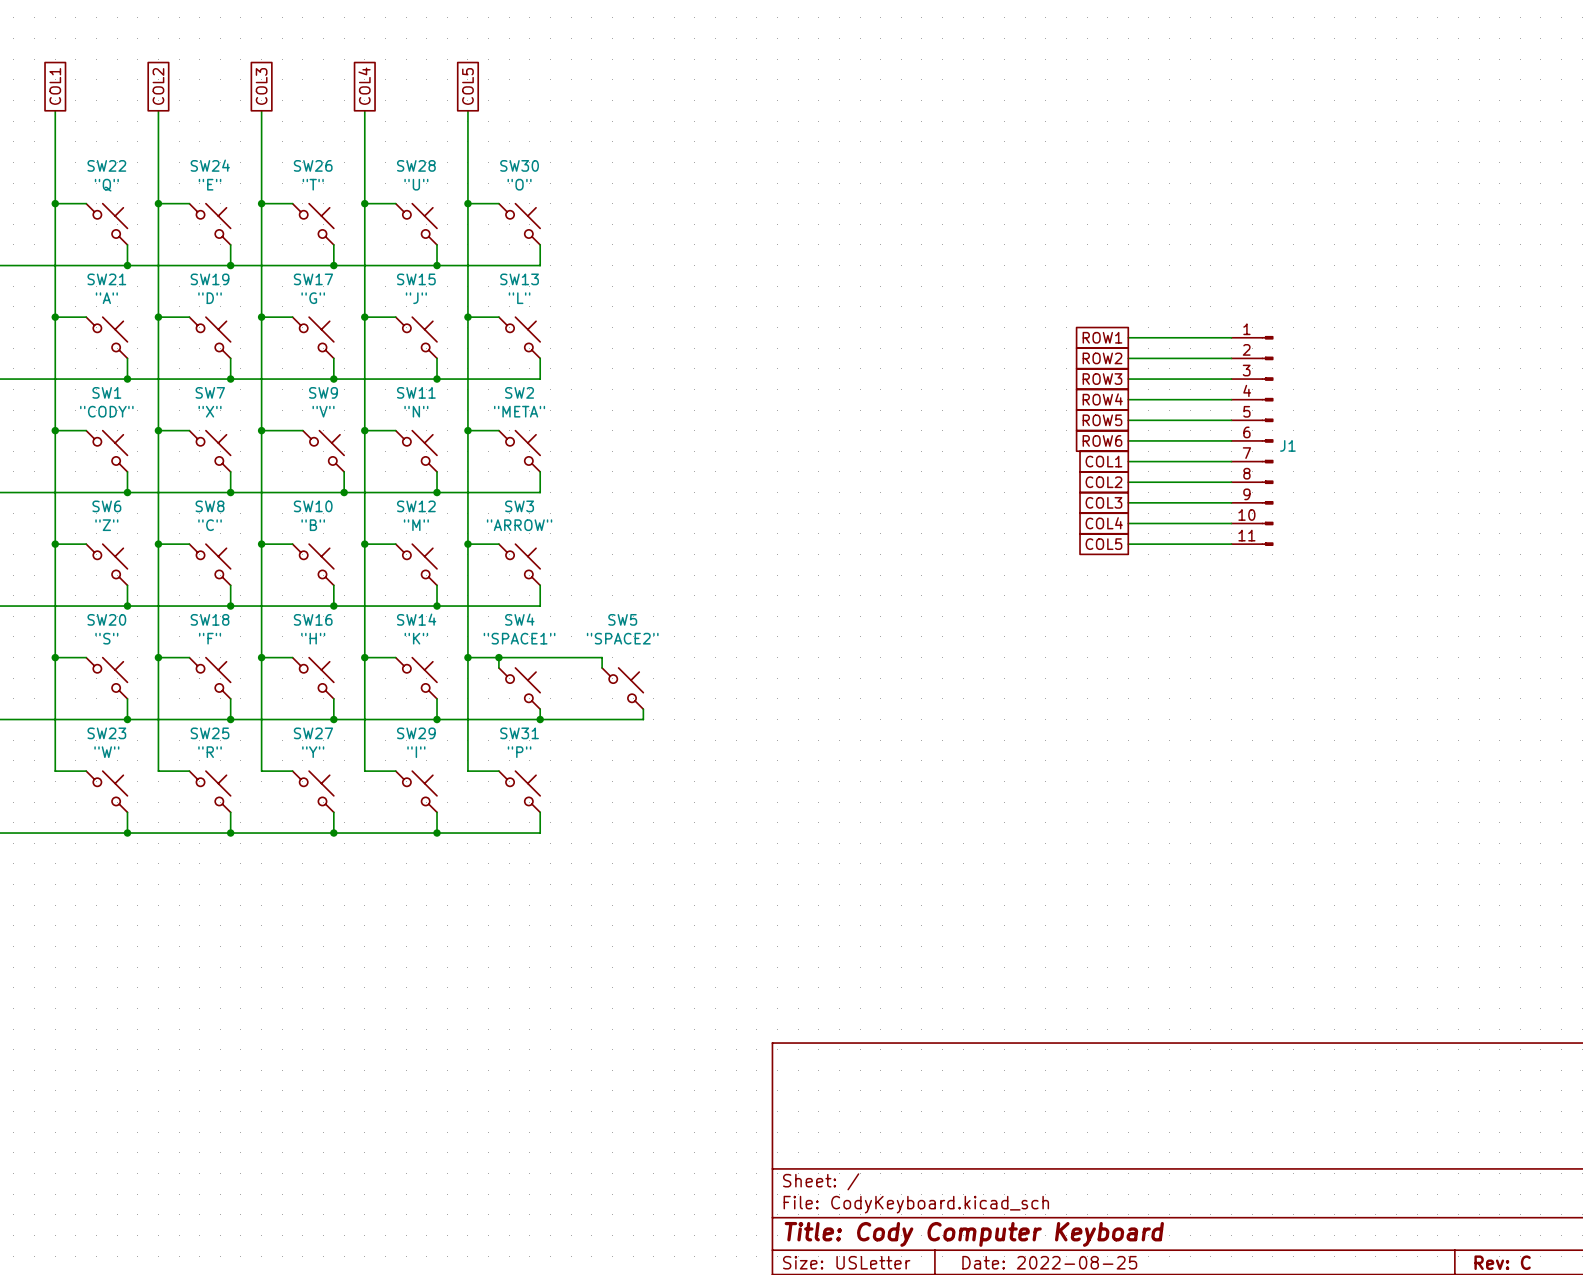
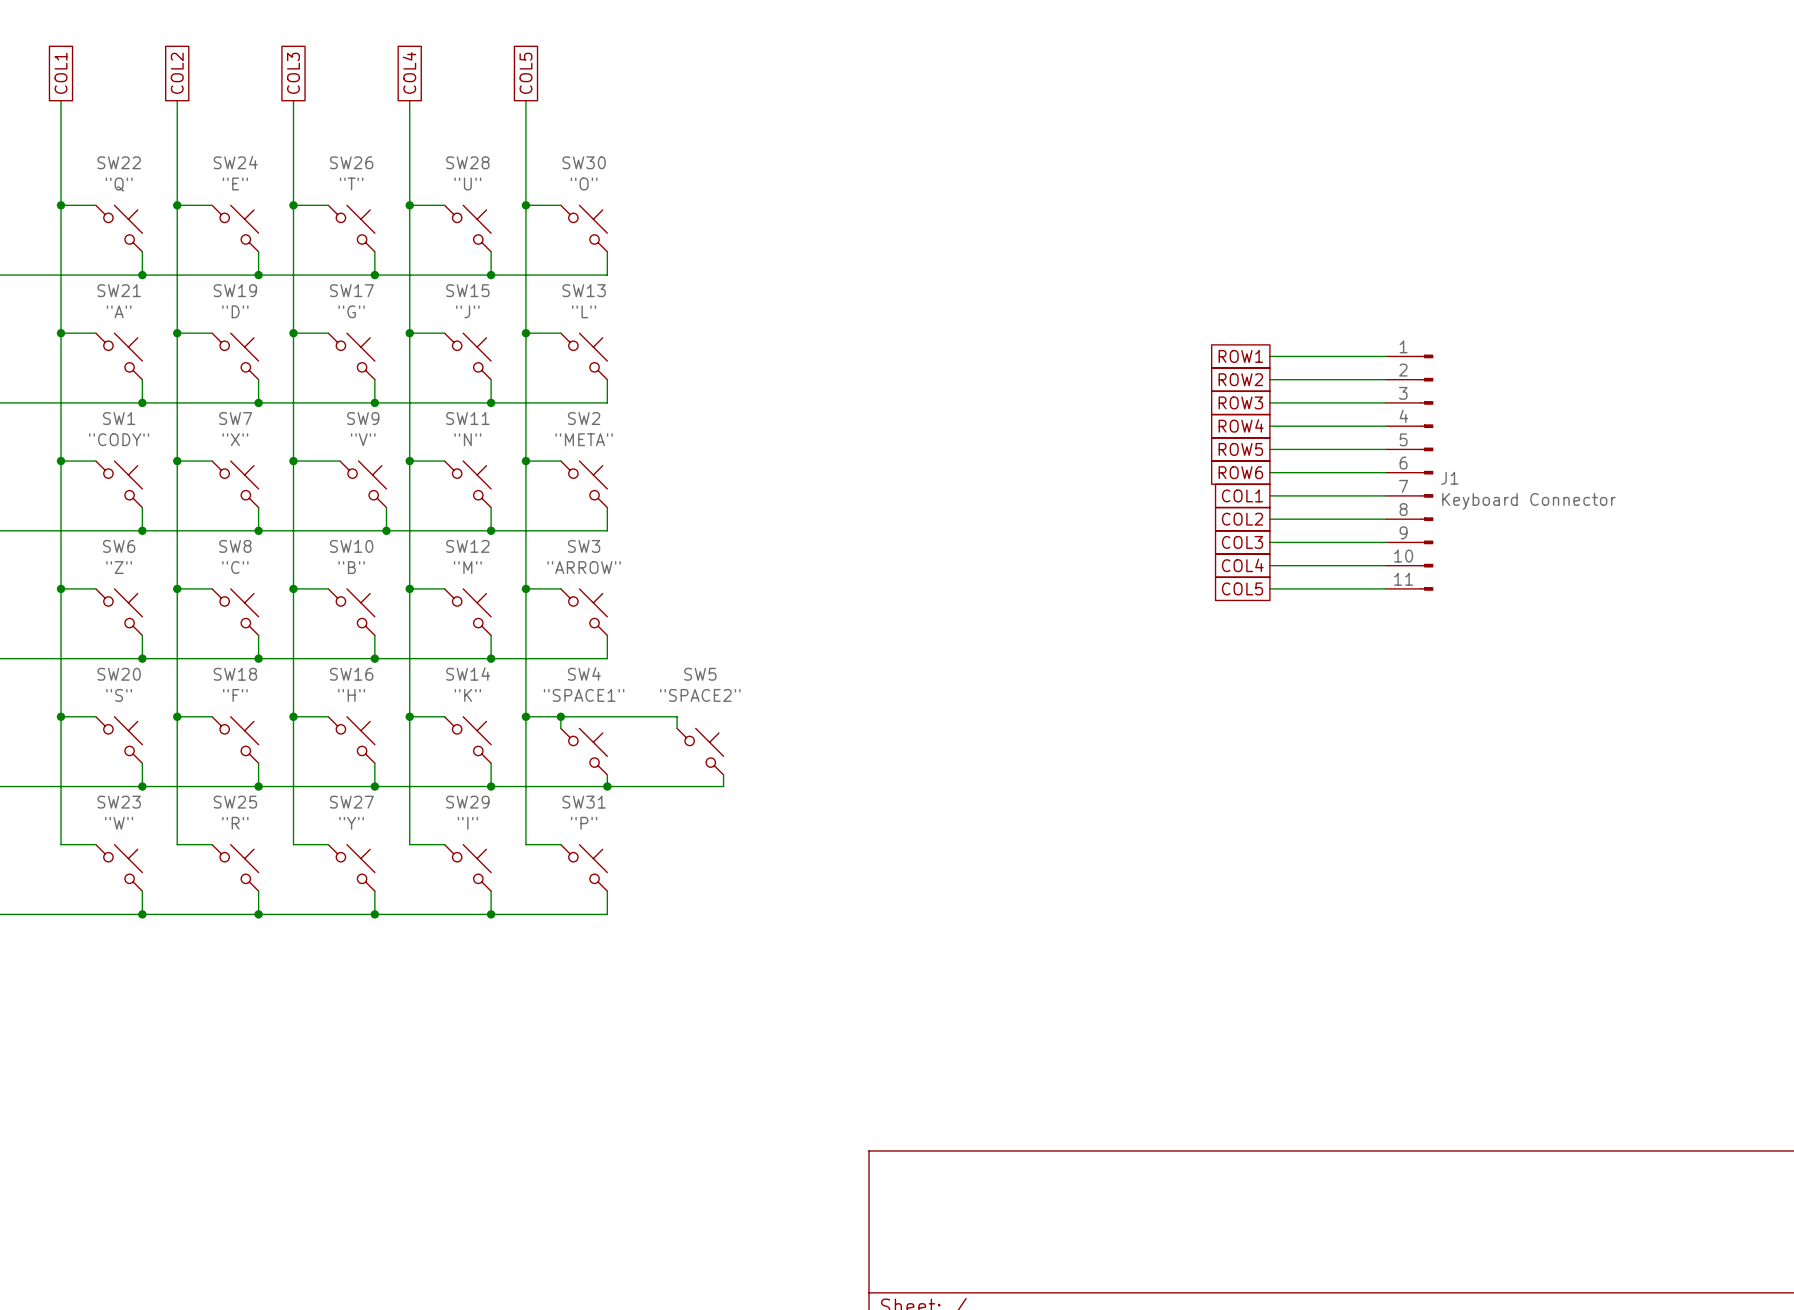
J1 value: none -> Keyboard Connector (1528, 501)

